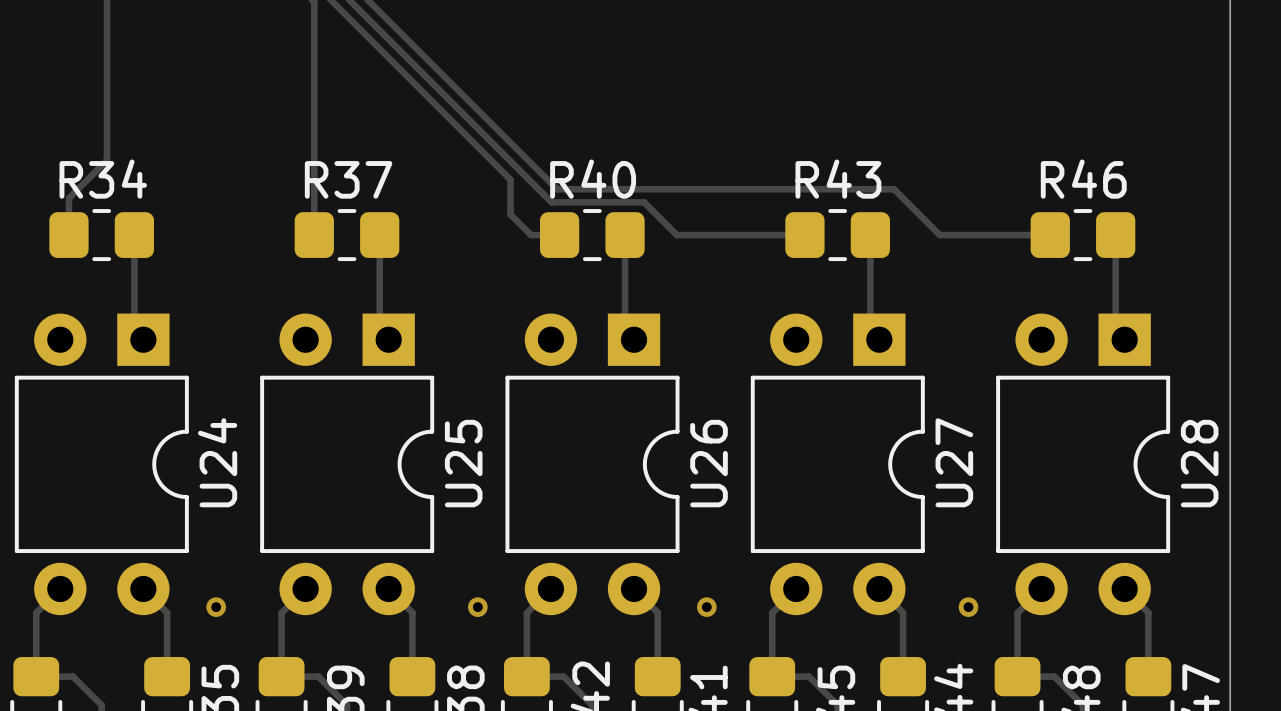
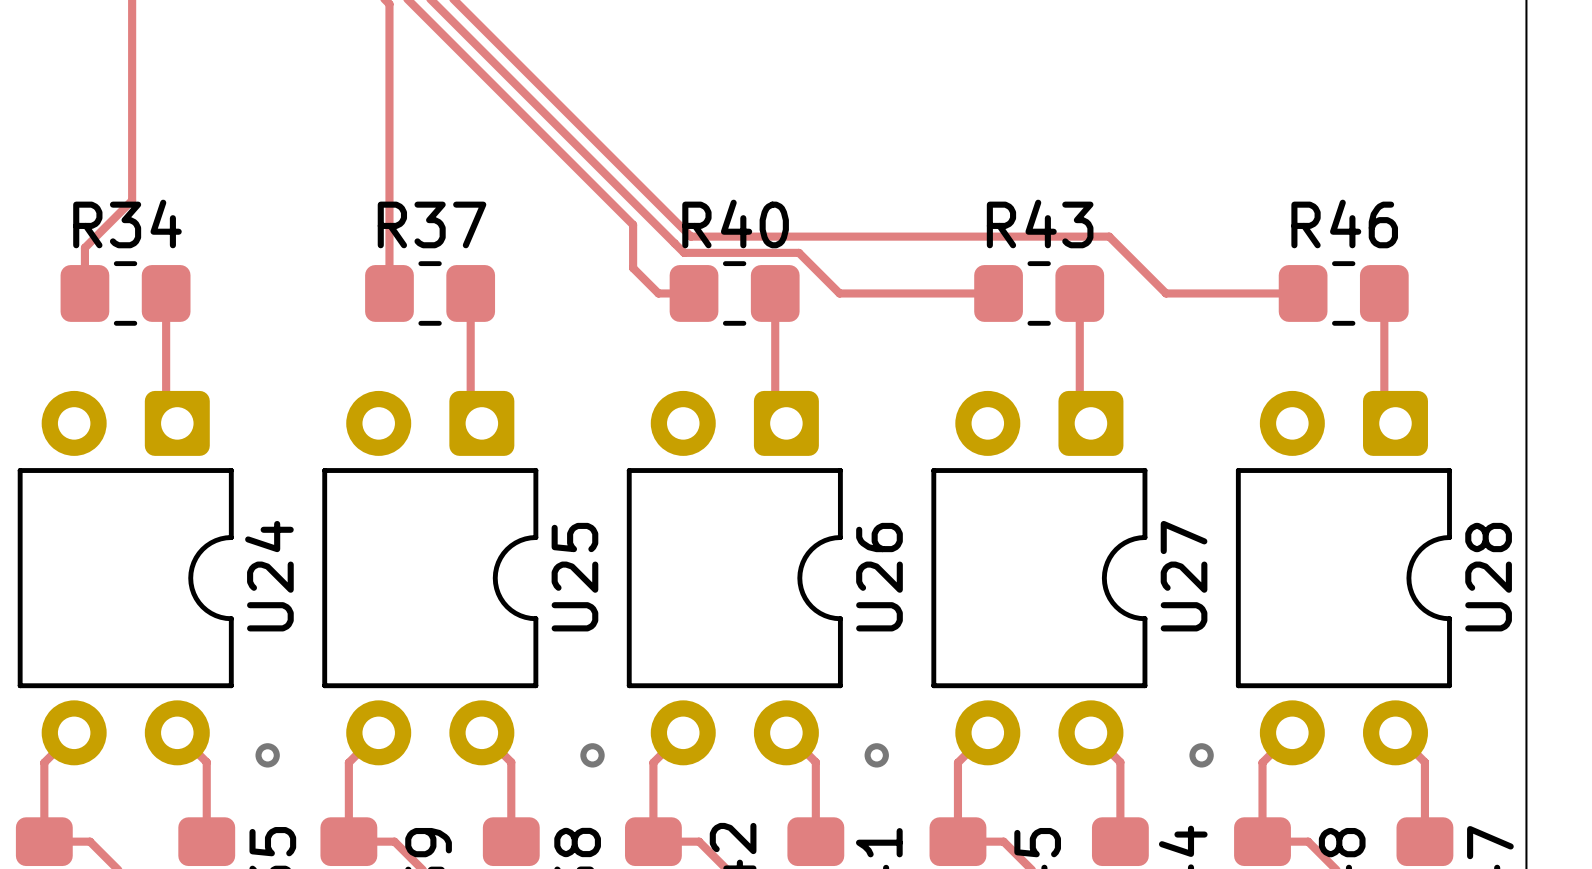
U24 footprint: [14, 313, 189, 616] -> [17, 390, 234, 766]
U25 footprint: [260, 313, 435, 616] -> [322, 390, 539, 766]
U26 footprint: [505, 313, 680, 616] -> [626, 390, 843, 766]
U27 footprint: [750, 313, 925, 616] -> [931, 390, 1148, 766]
U28 footprint: [996, 313, 1171, 616] -> [1235, 390, 1452, 766]

